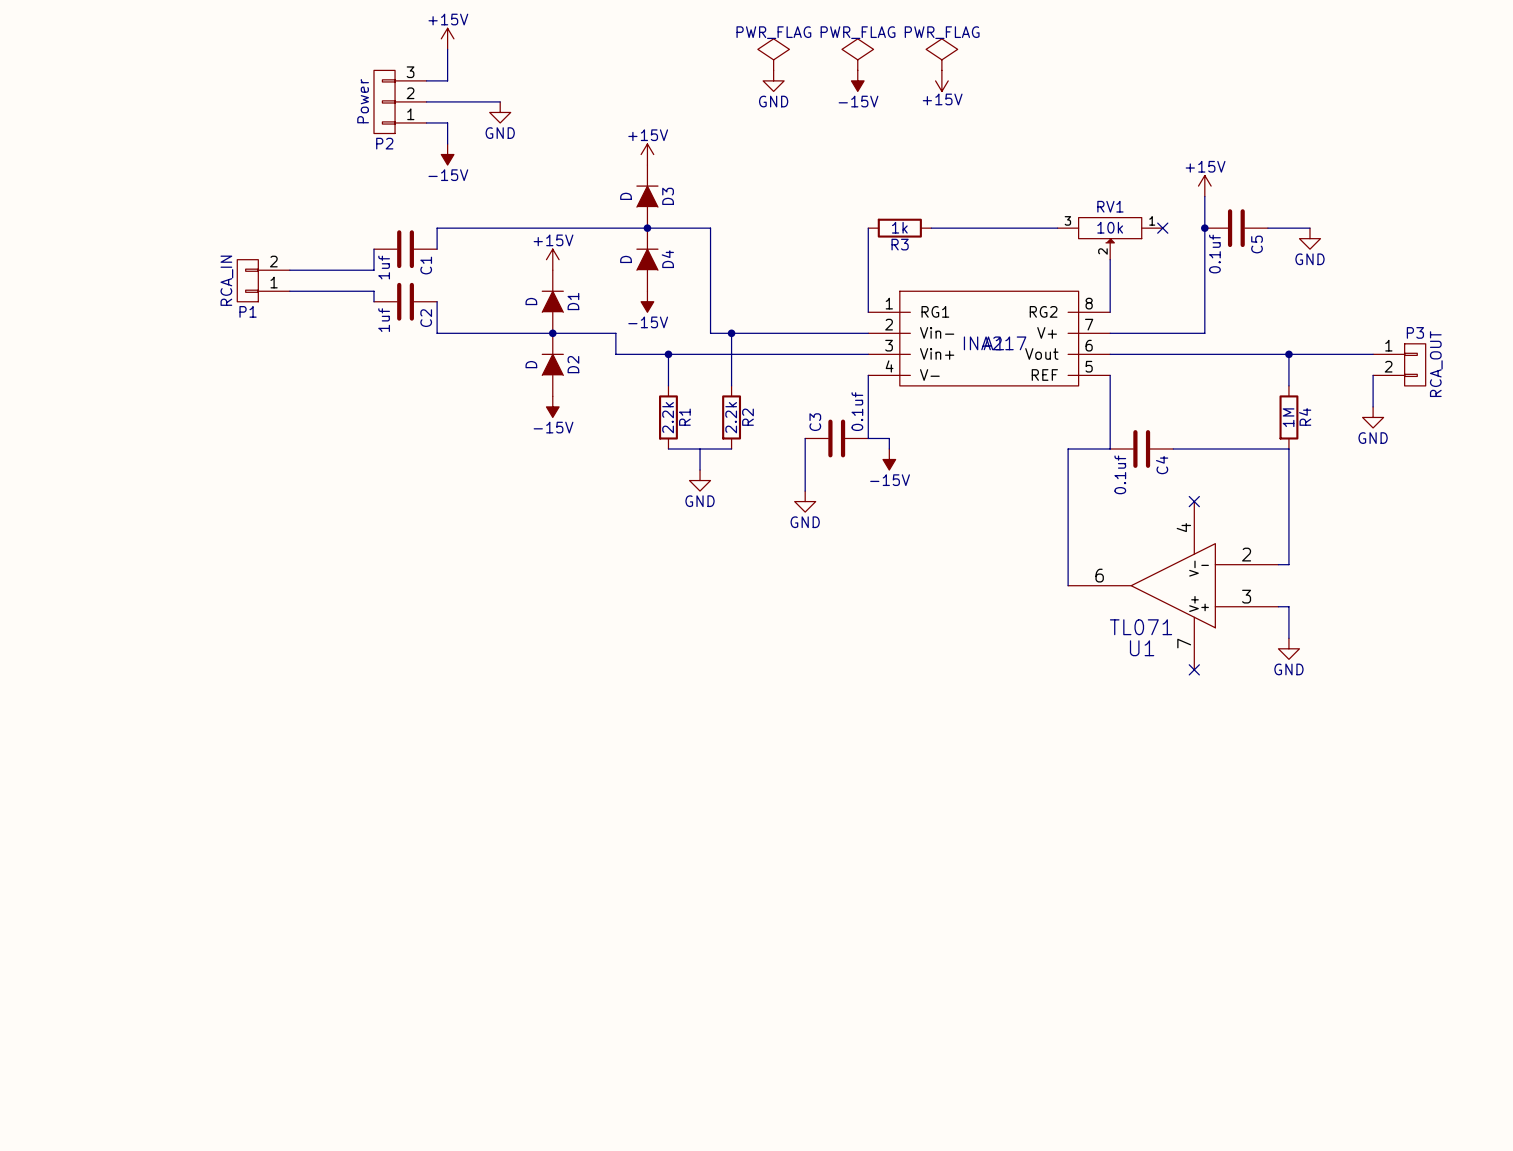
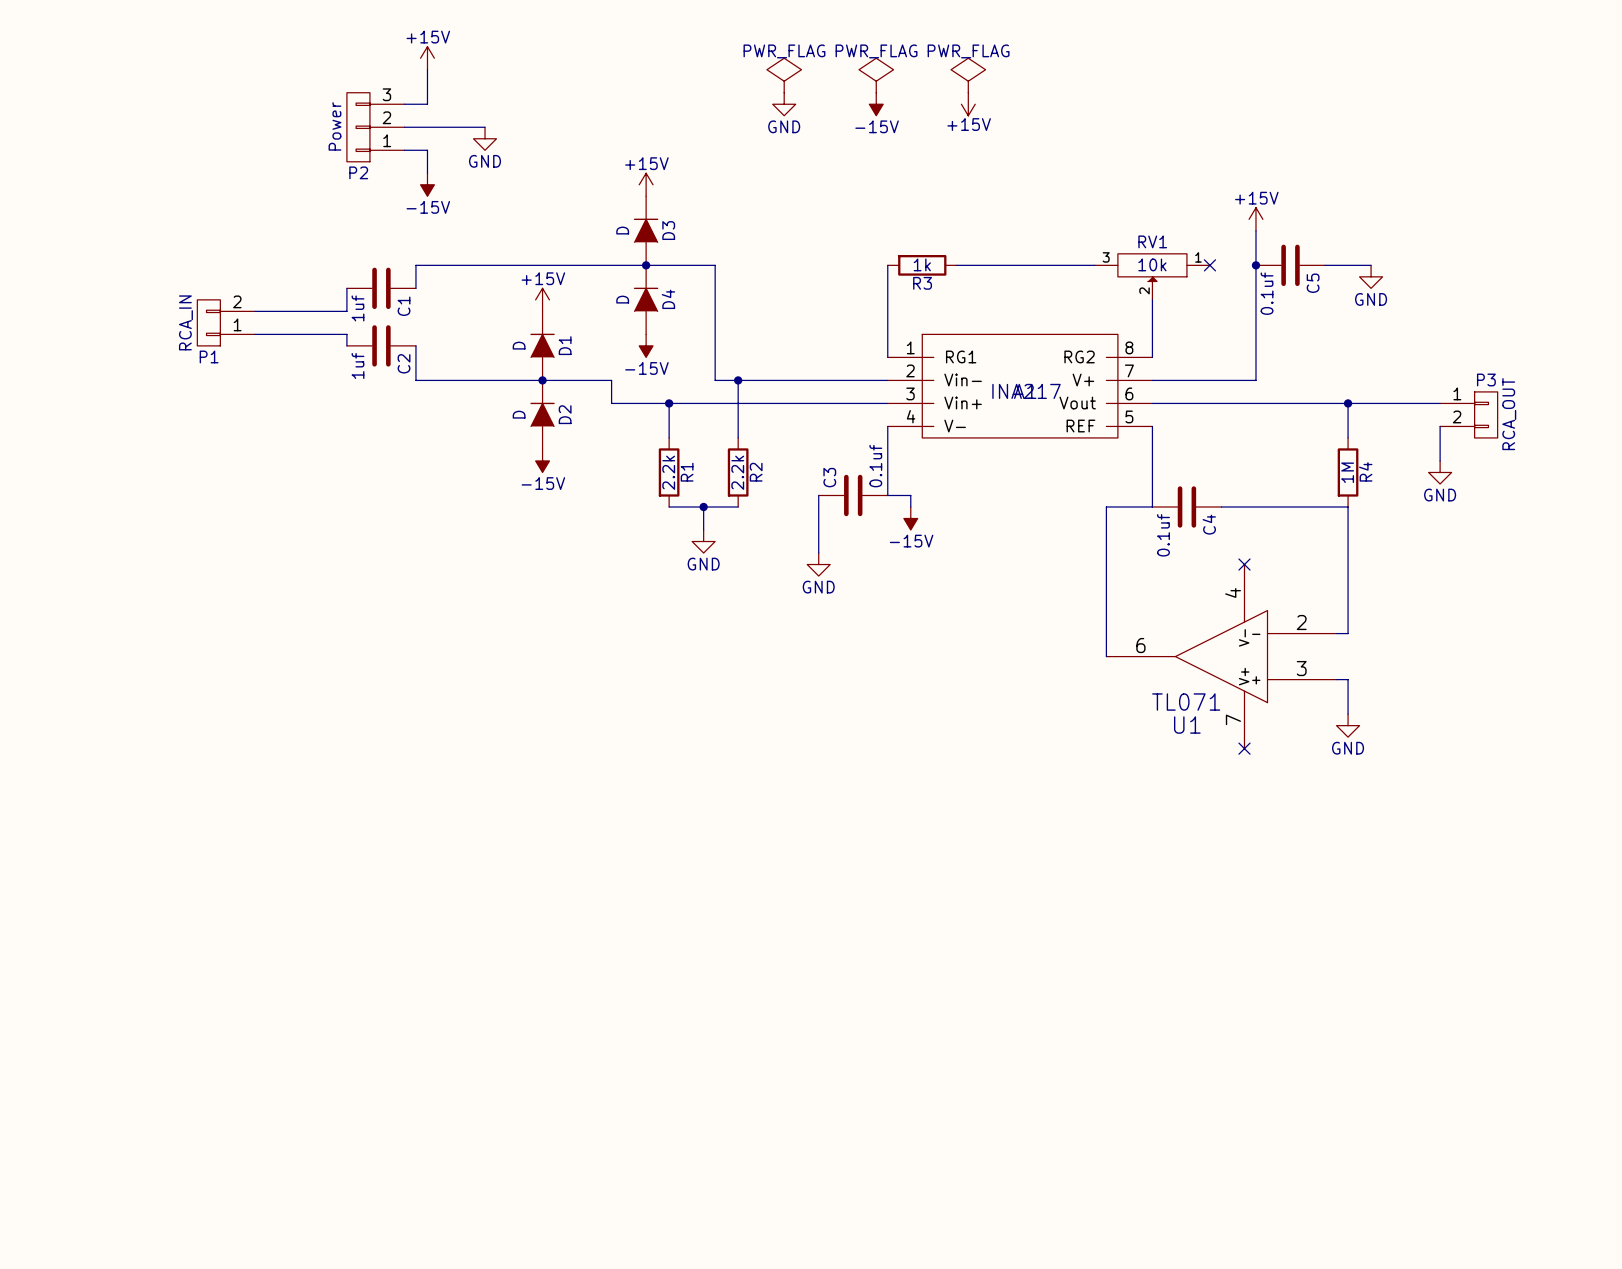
junction: none -> (703, 507)

